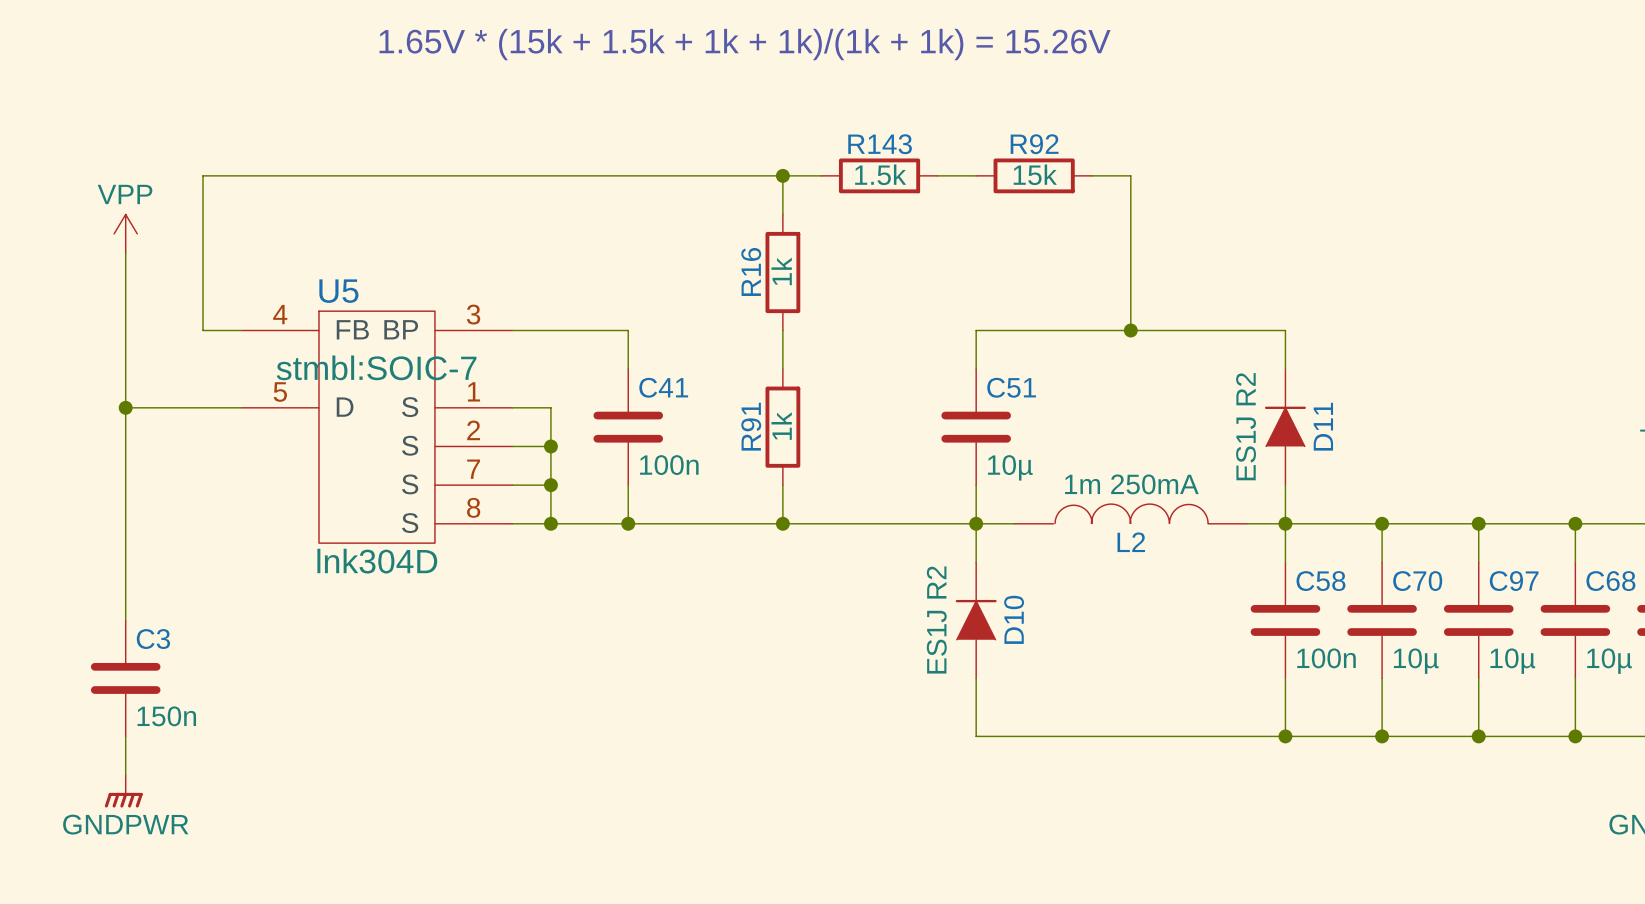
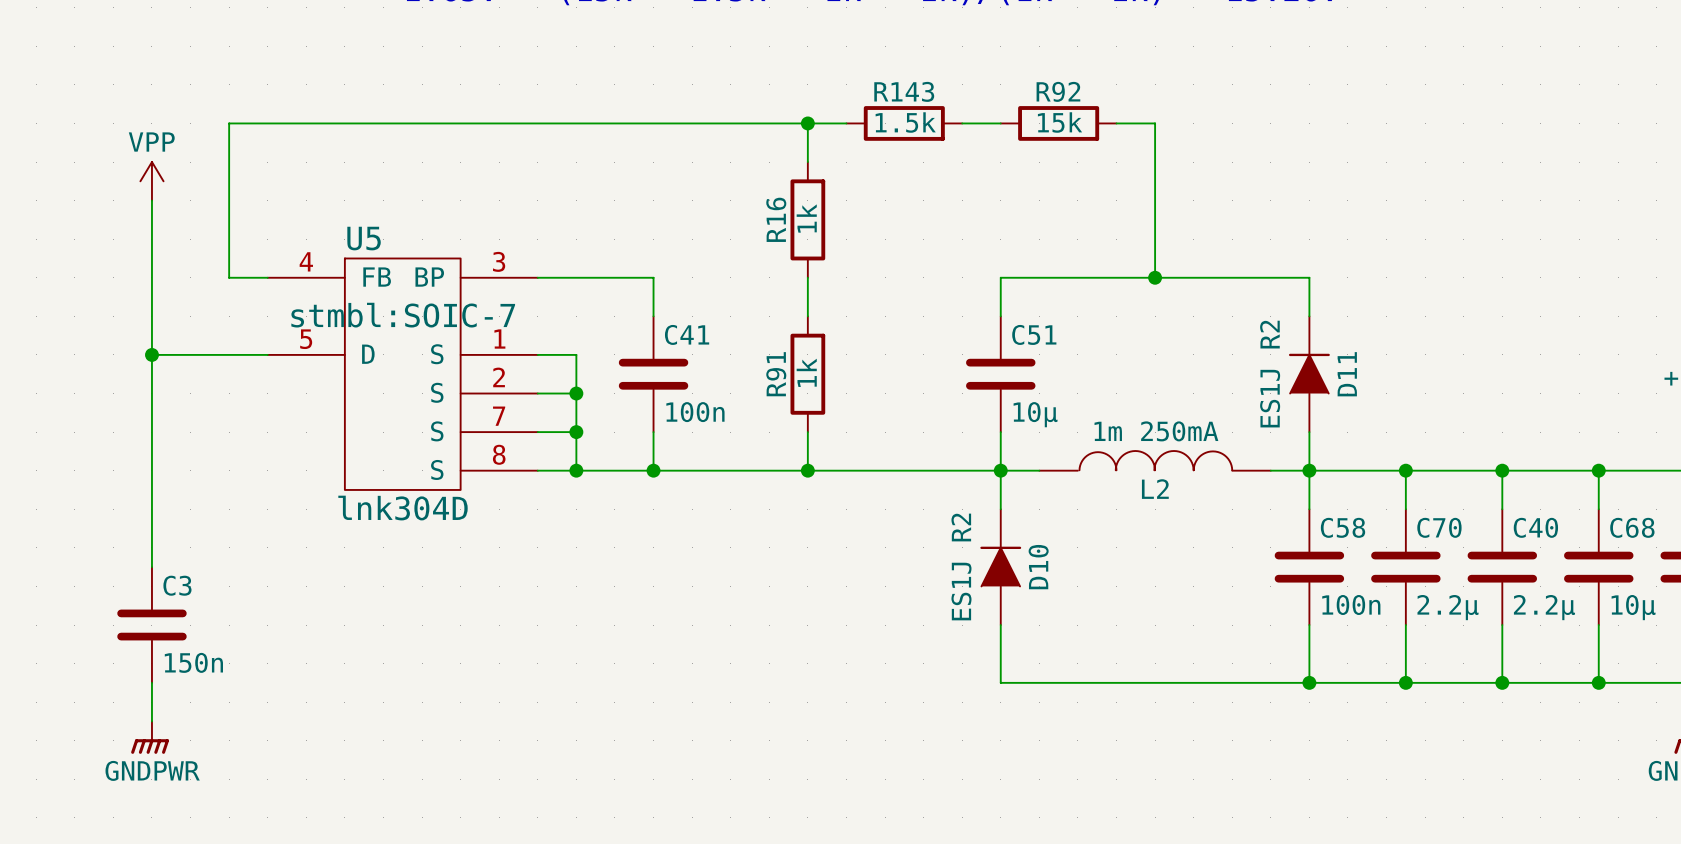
C97 name: C97 (1514, 581) -> C40 (1535, 527)
C70 value: 10µ (1416, 661) -> 2.2µ (1448, 607)
C97 value: 10µ (1512, 661) -> 2.2µ (1544, 607)

